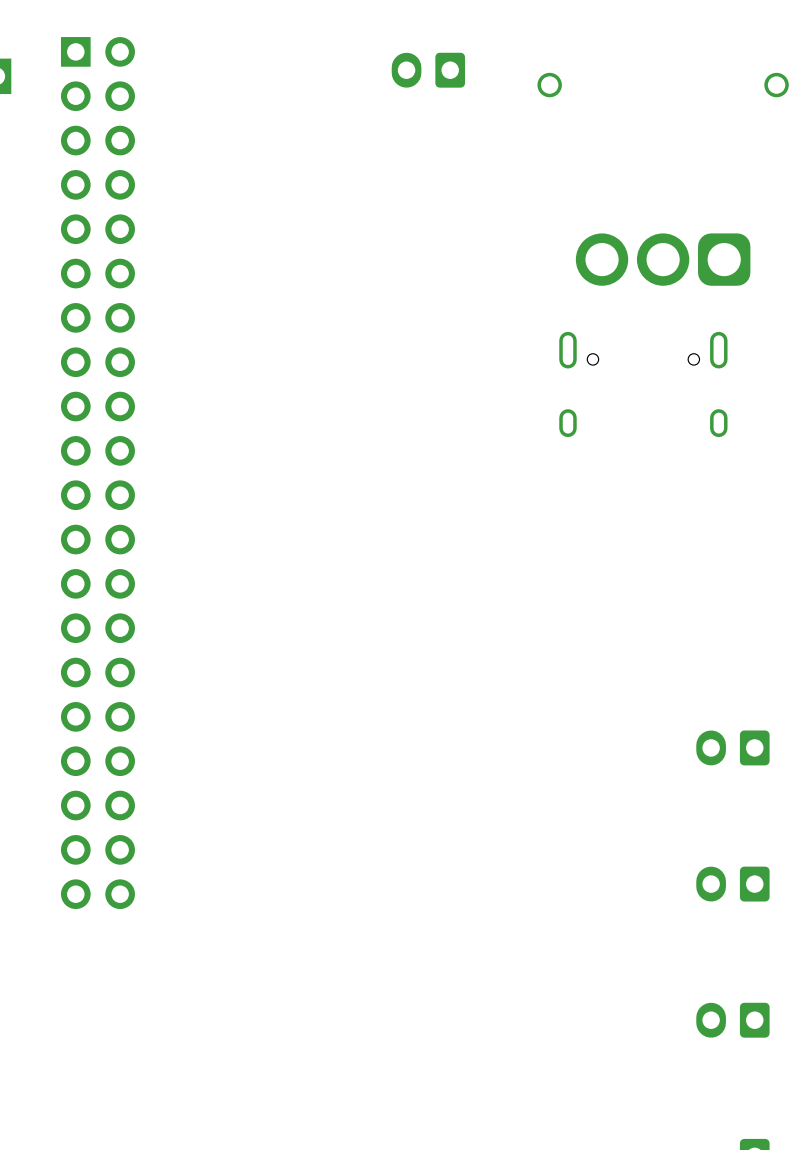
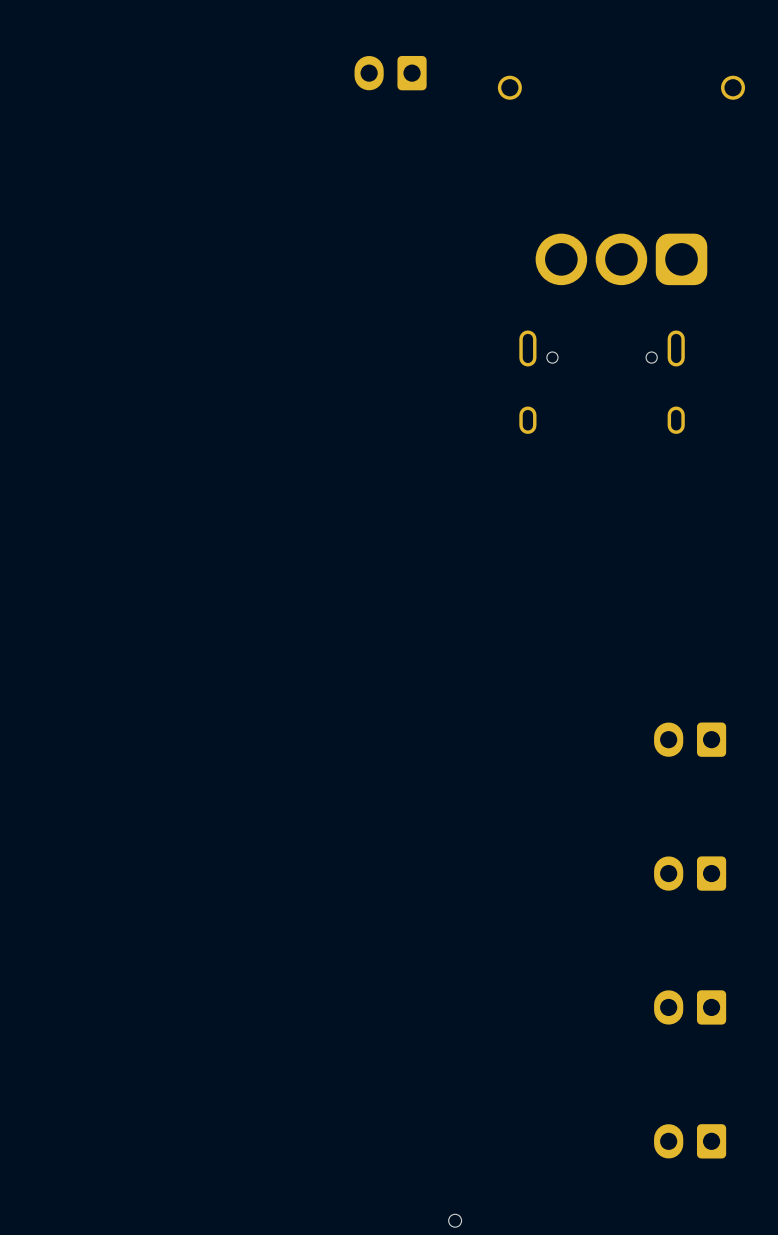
part: (97, 473) -> none

